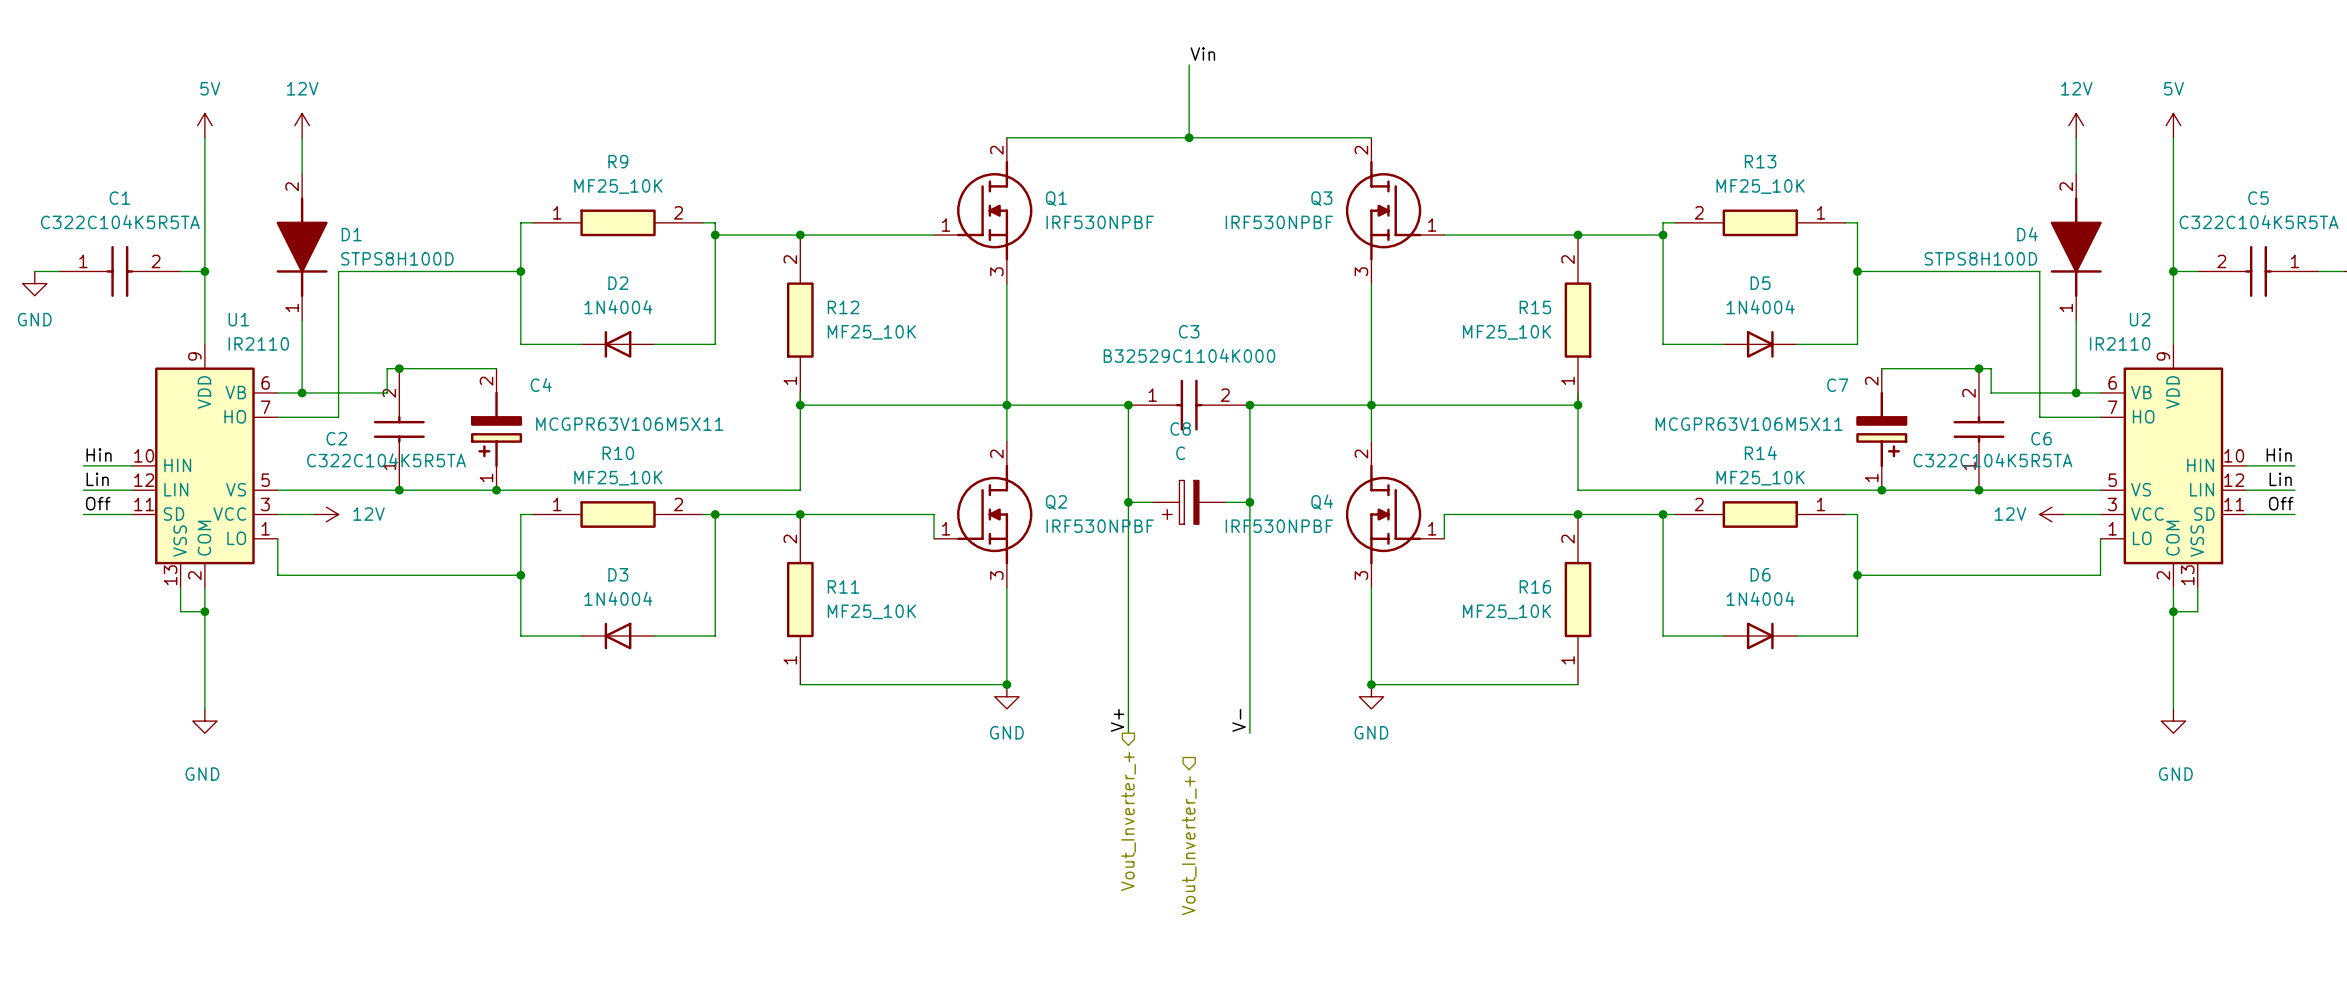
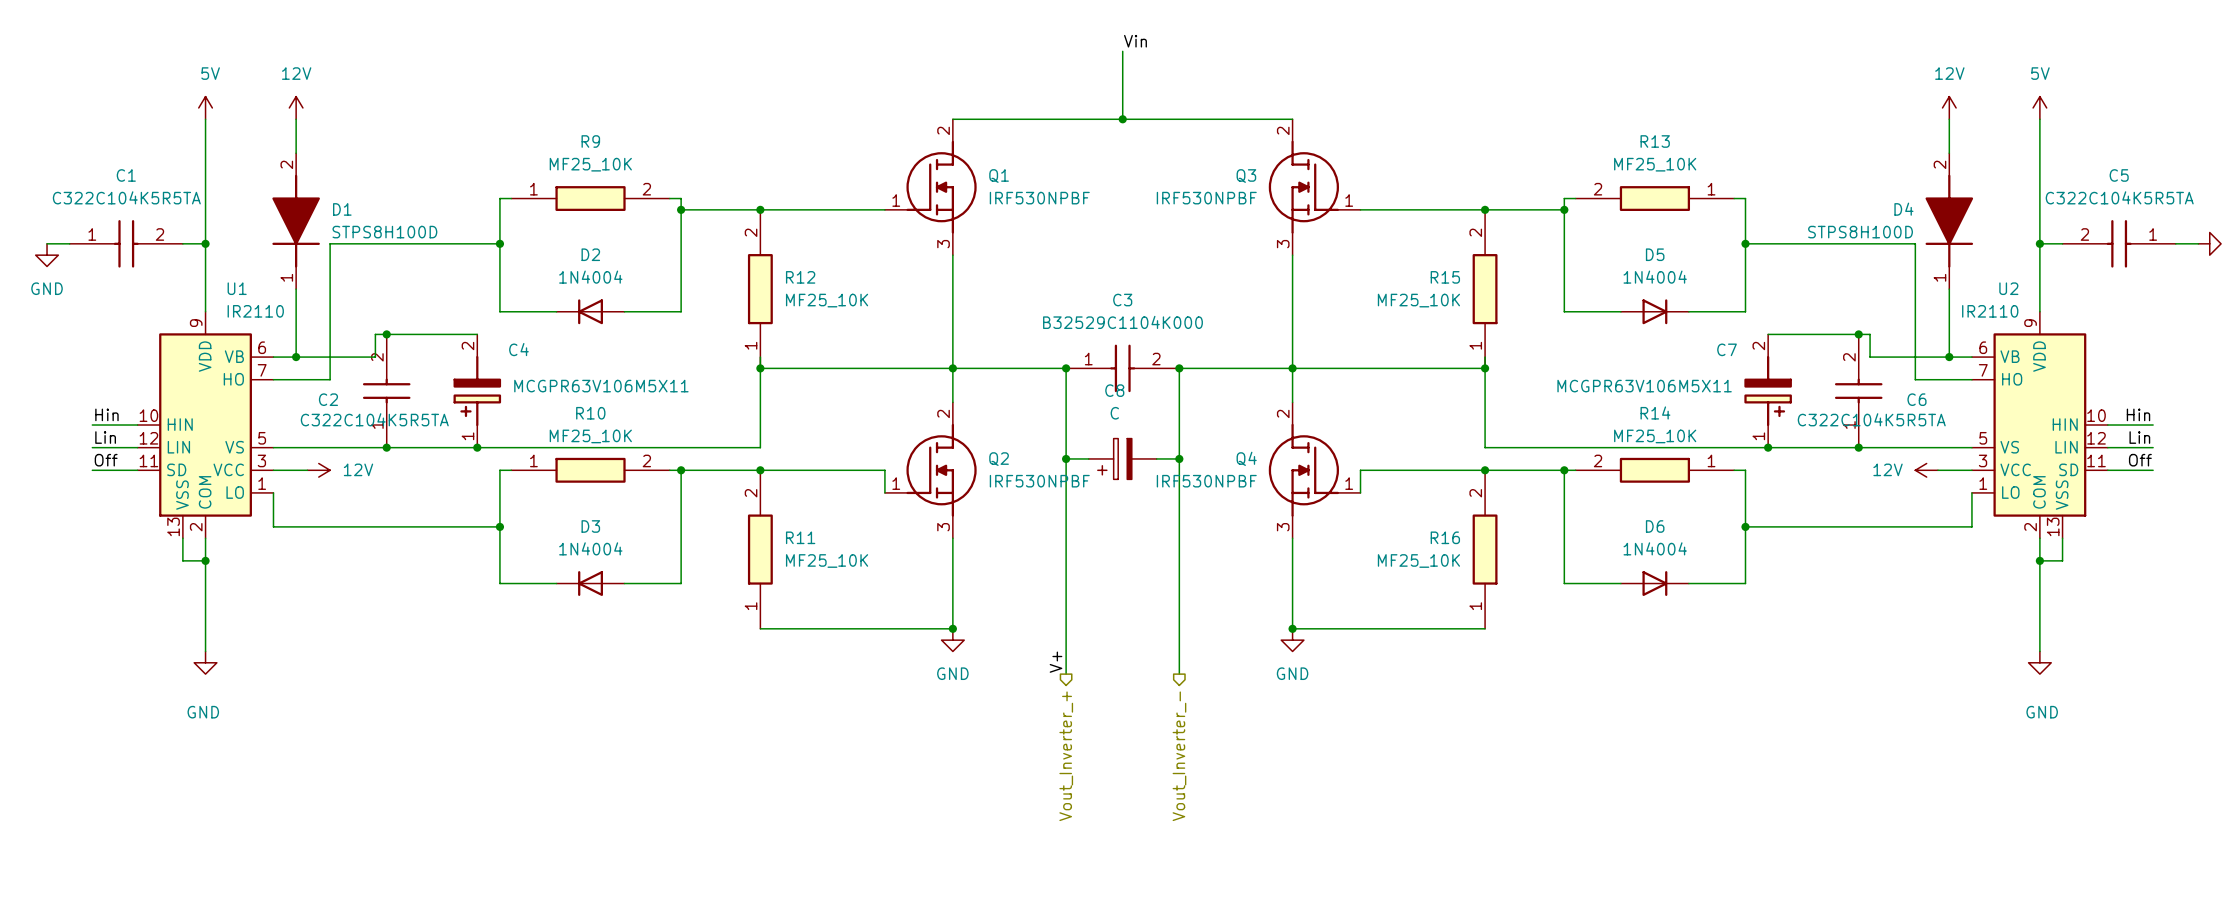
label: V- (1239, 720) -> none
hierarchical label: none -> Vout_Inverter_- (1179, 756)
hierarchical label: Vout_Inverter_+ (1189, 845) -> none

